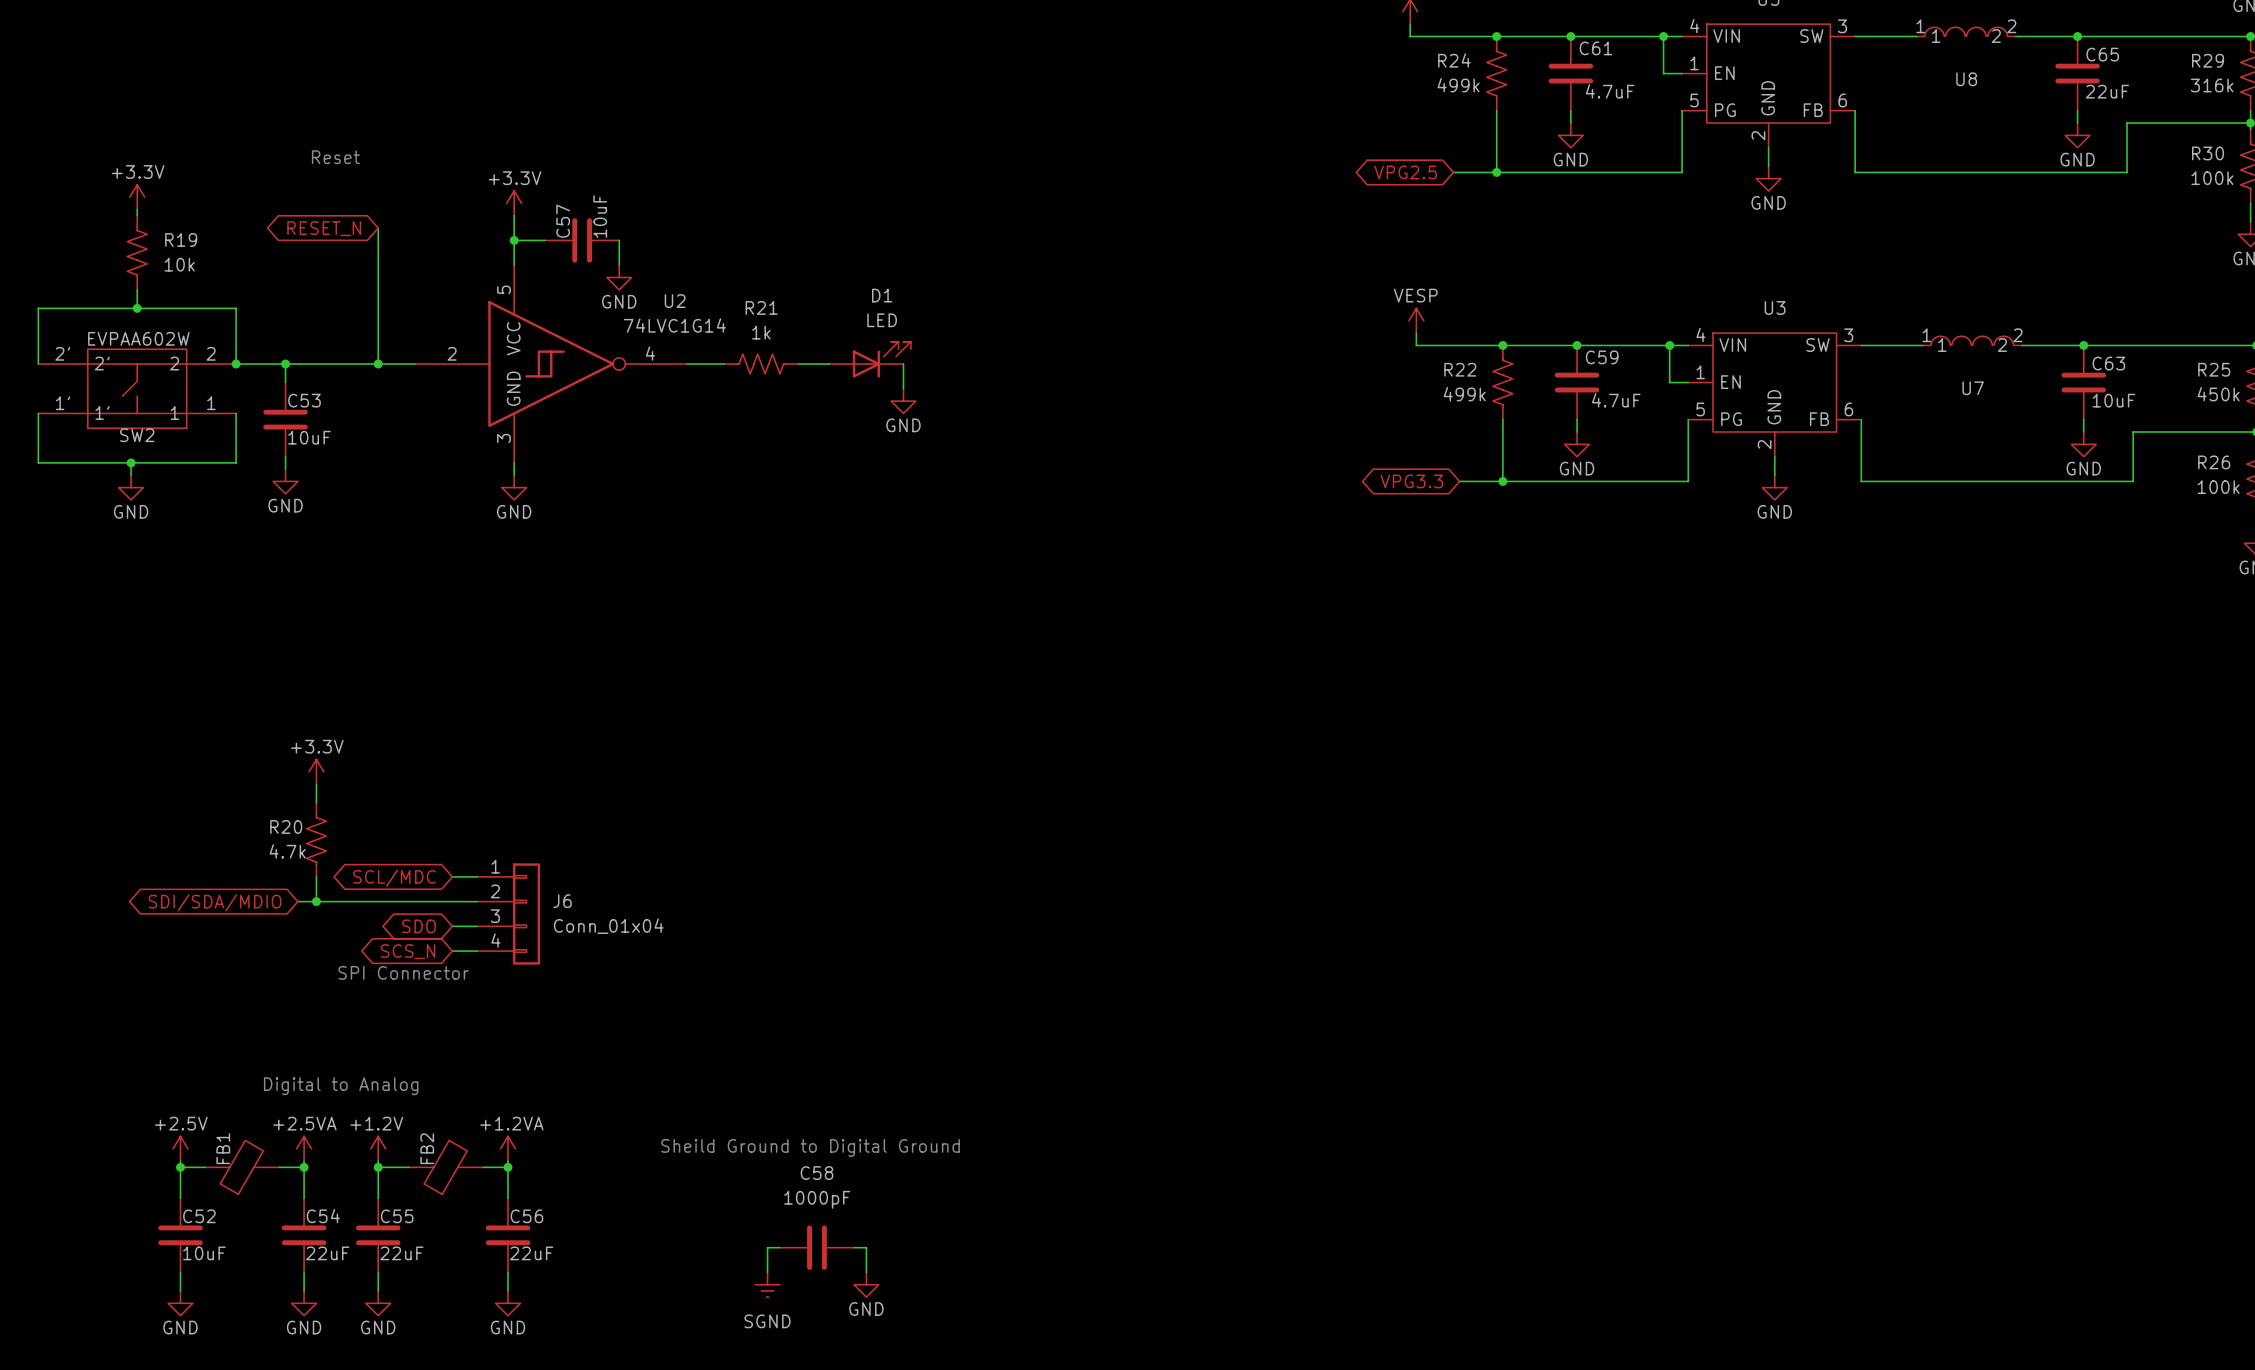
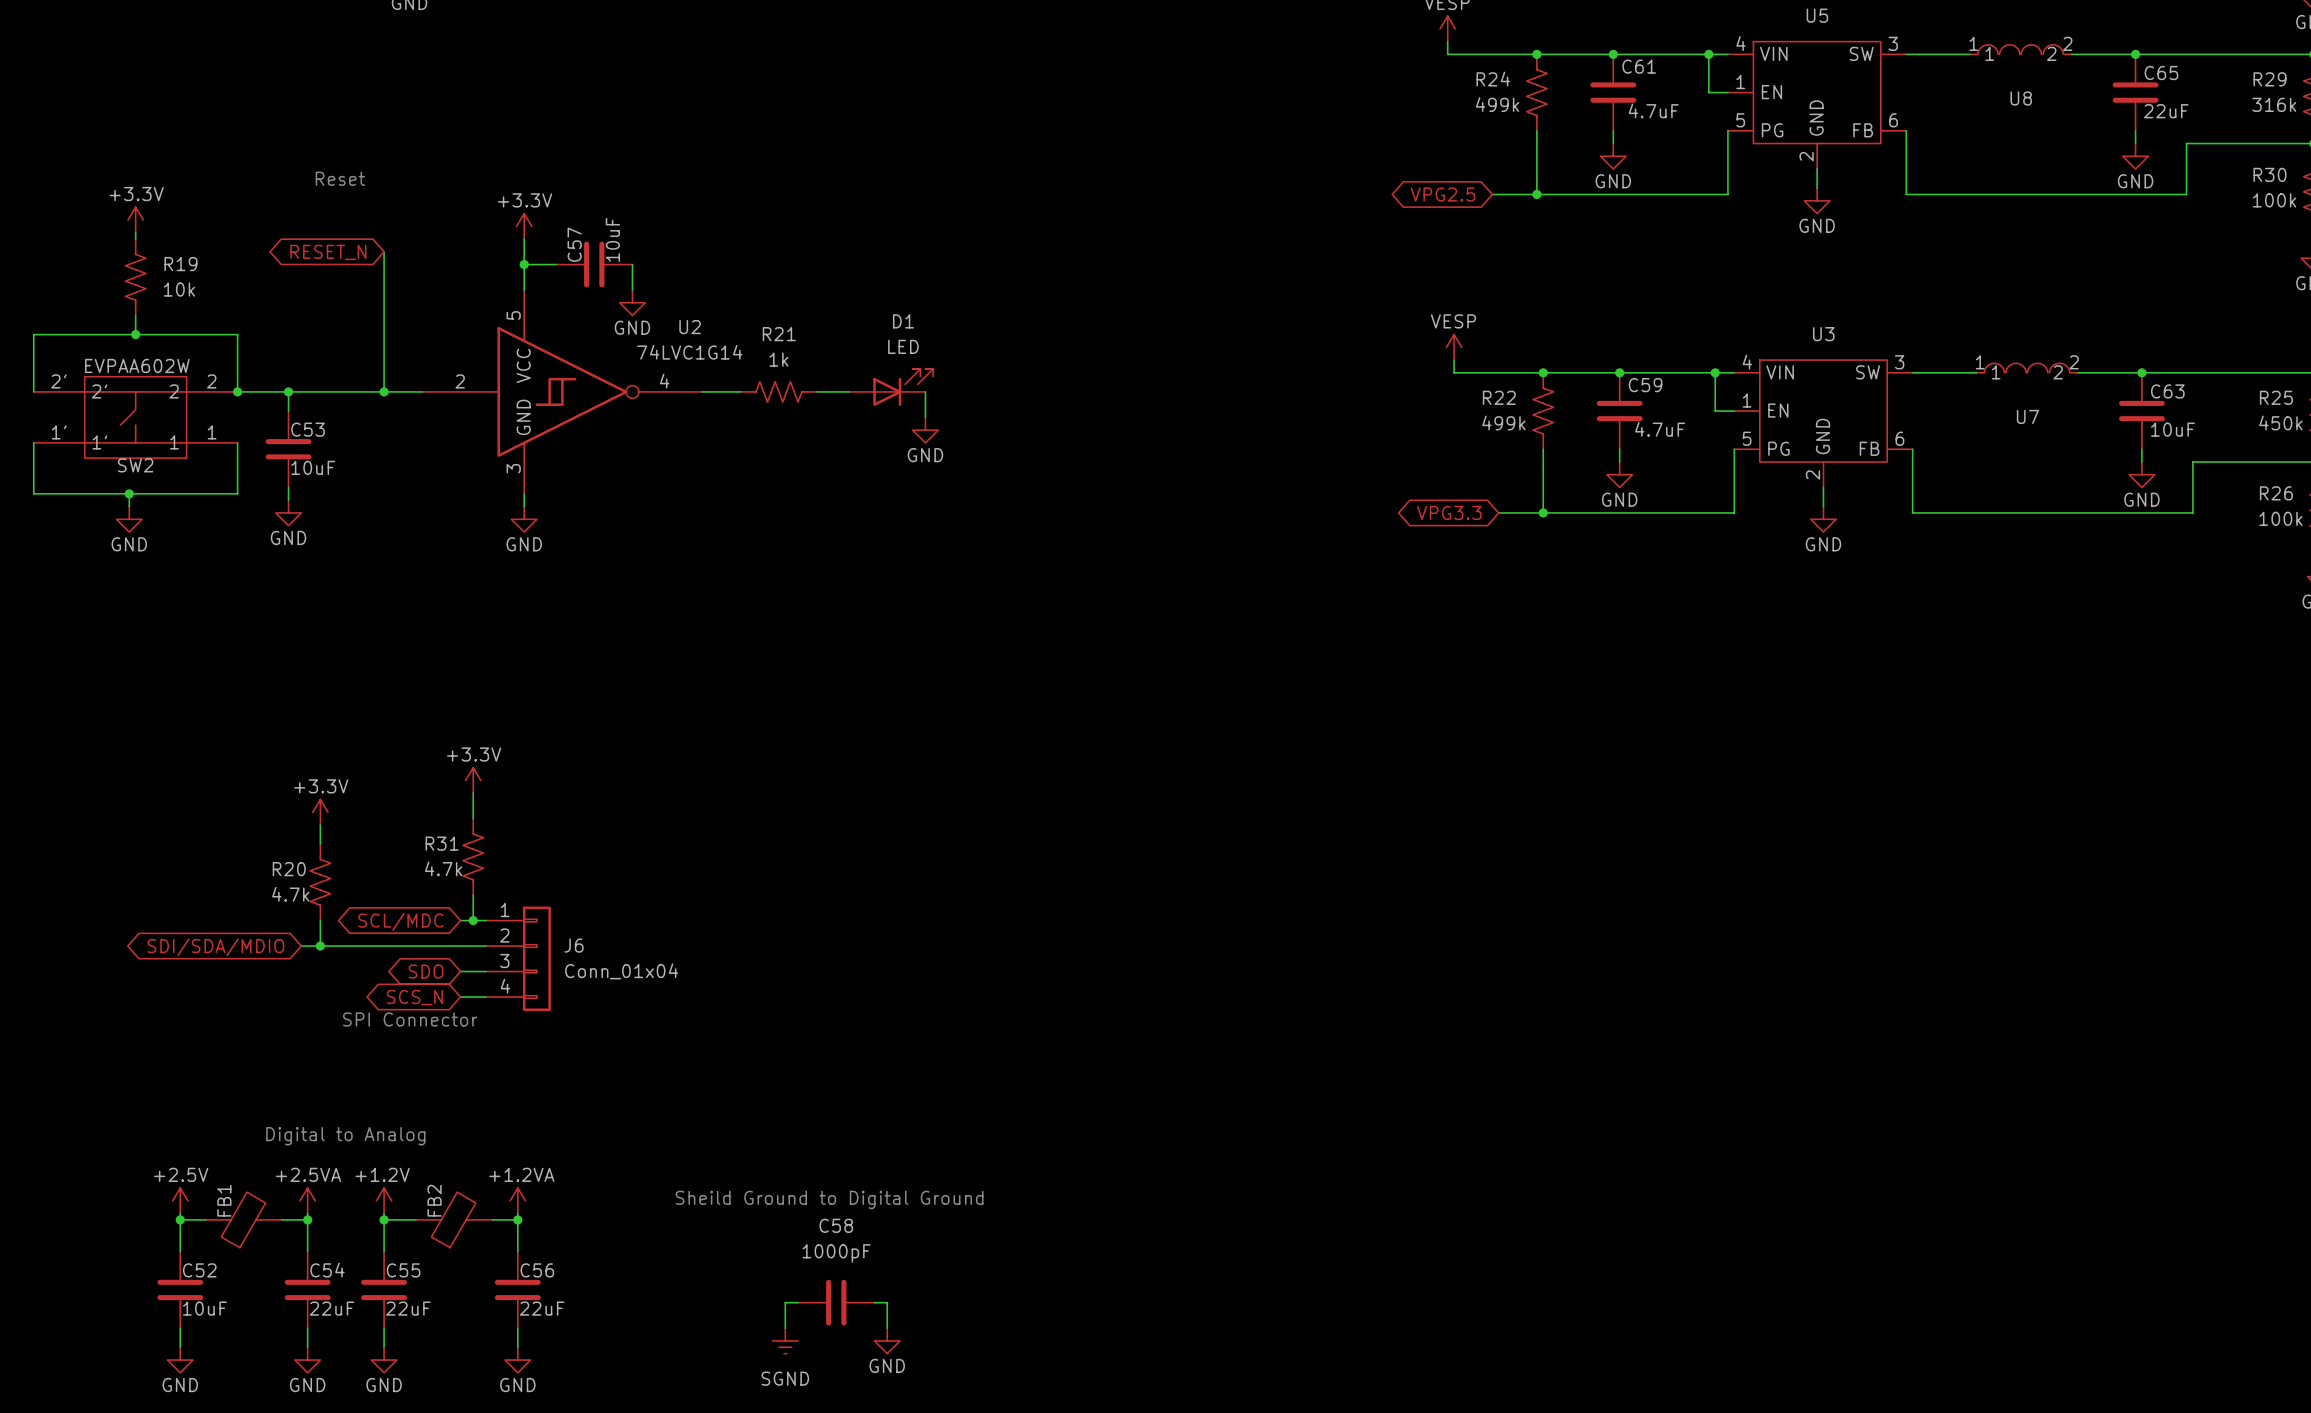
power symbol: none -> +3.3V (473, 780)
wire: none -> (473, 793) (473, 818)
R31: none -> 4.7k (473, 856)
wire: none -> (473, 895) (473, 920)
junction: none -> (473, 920)

